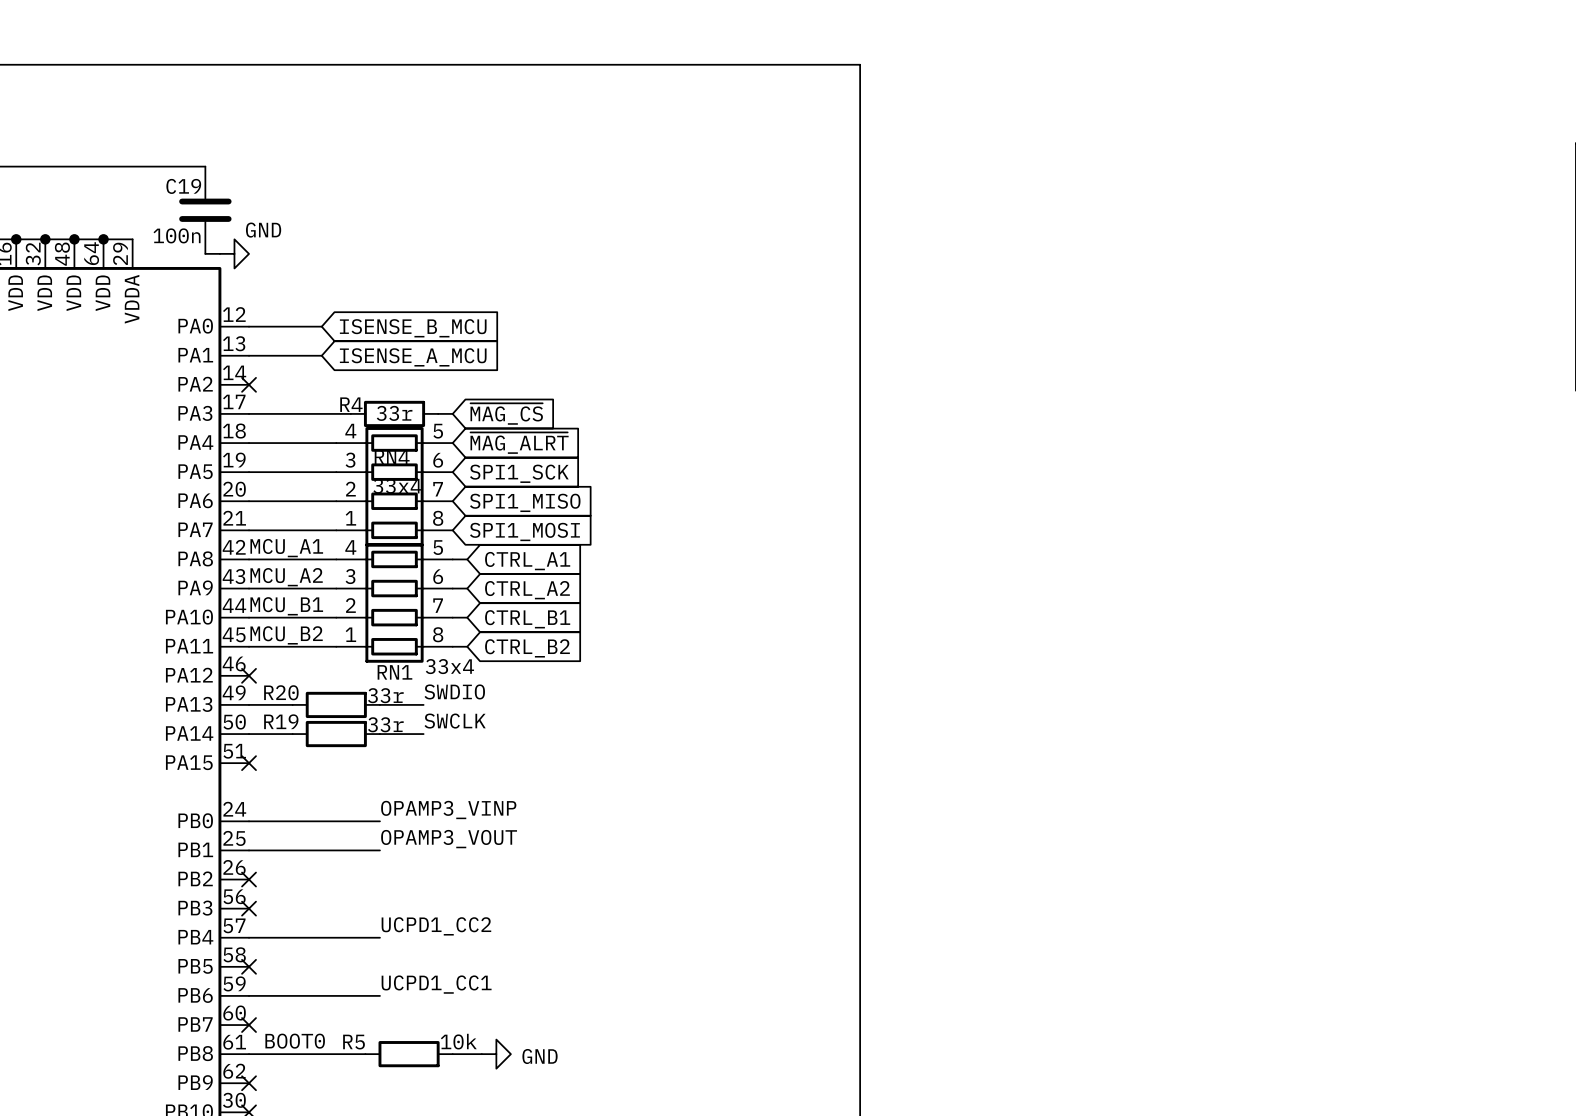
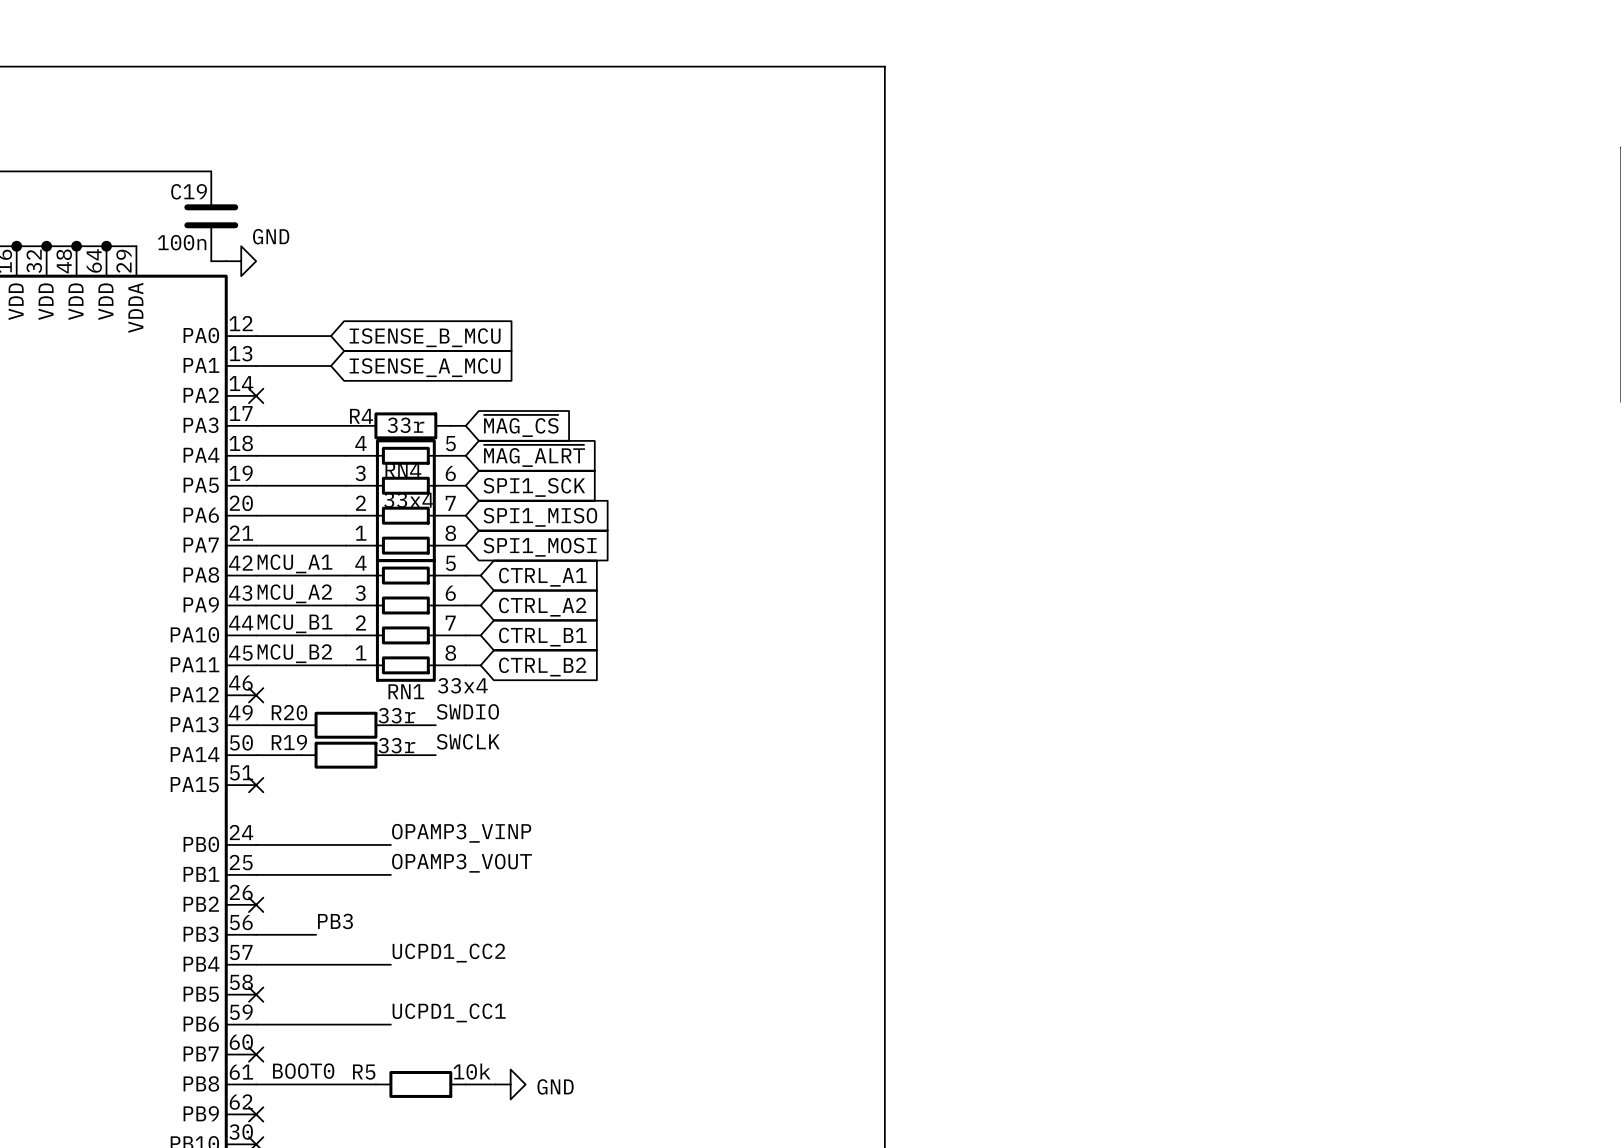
label: none -> PB3 (335, 921)
wire: none -> (256, 934) (316, 934)
no-connect mark: (249, 908) -> none

